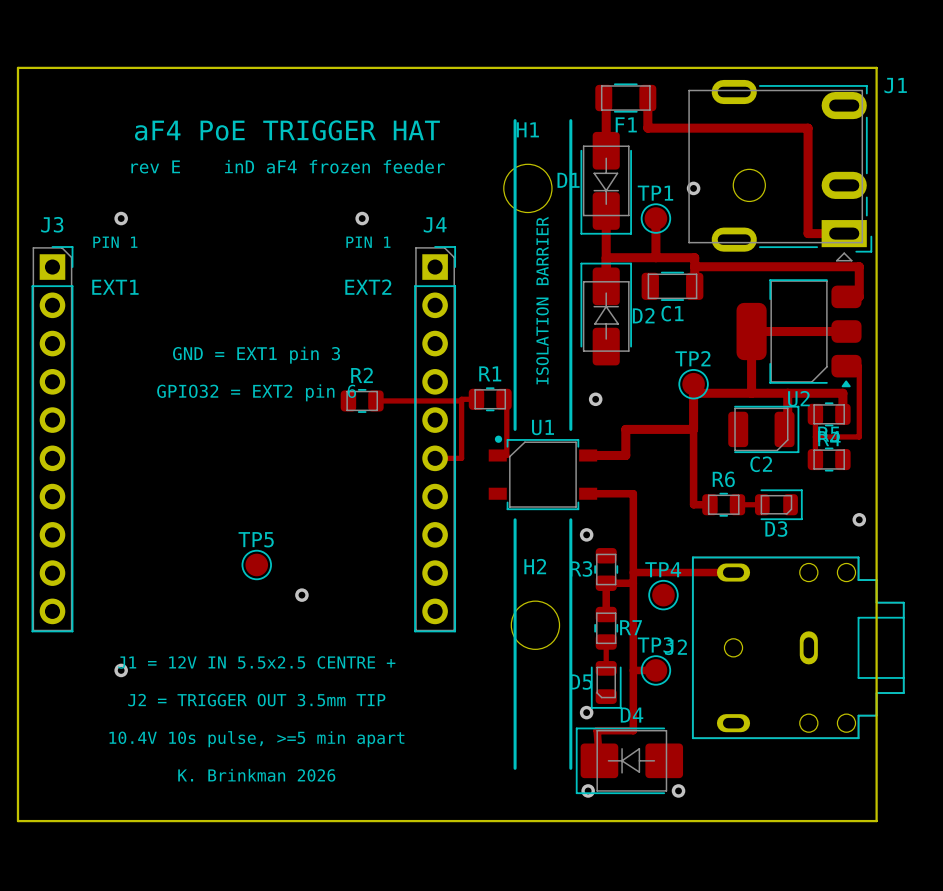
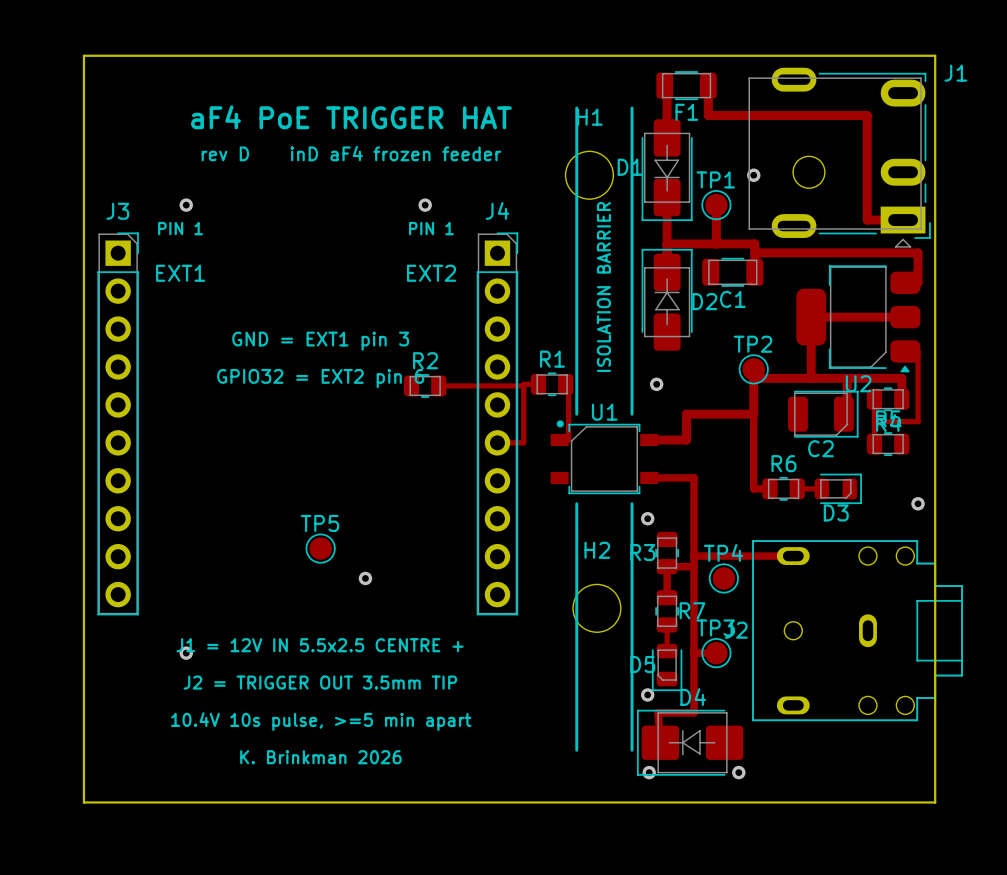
text: rev E inD aF4 frozen feeder (288, 166) -> rev D inD aF4 frozen feeder (351, 153)

